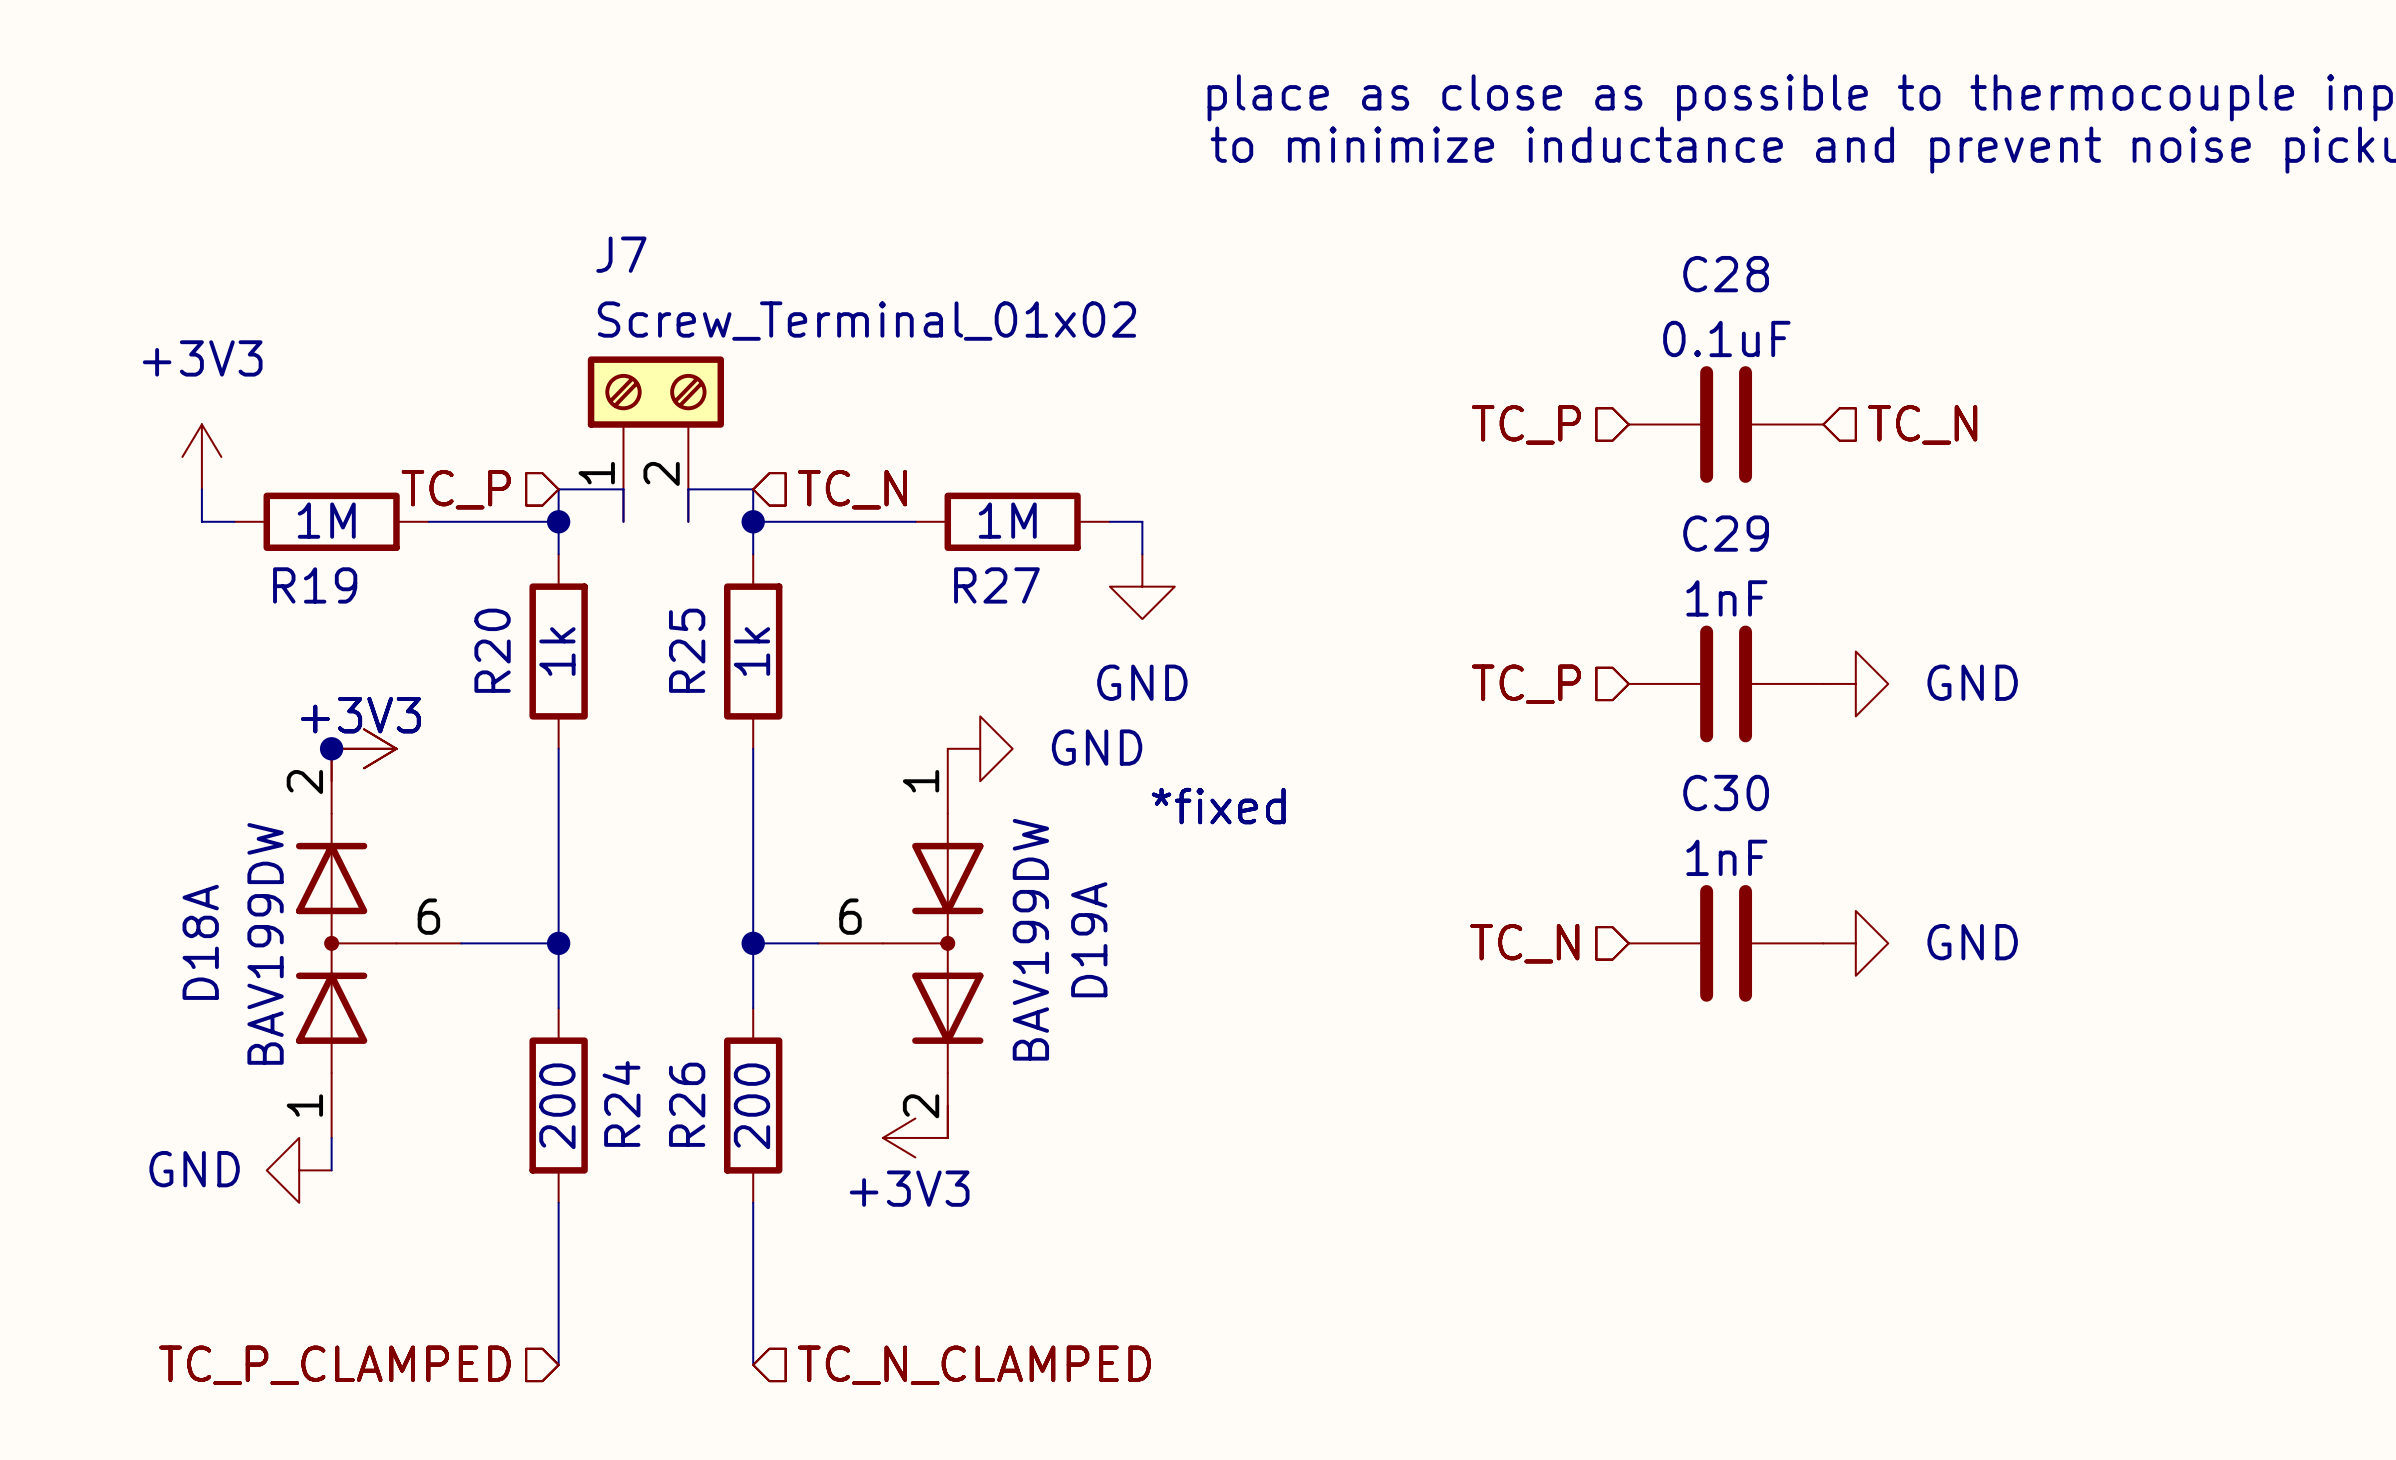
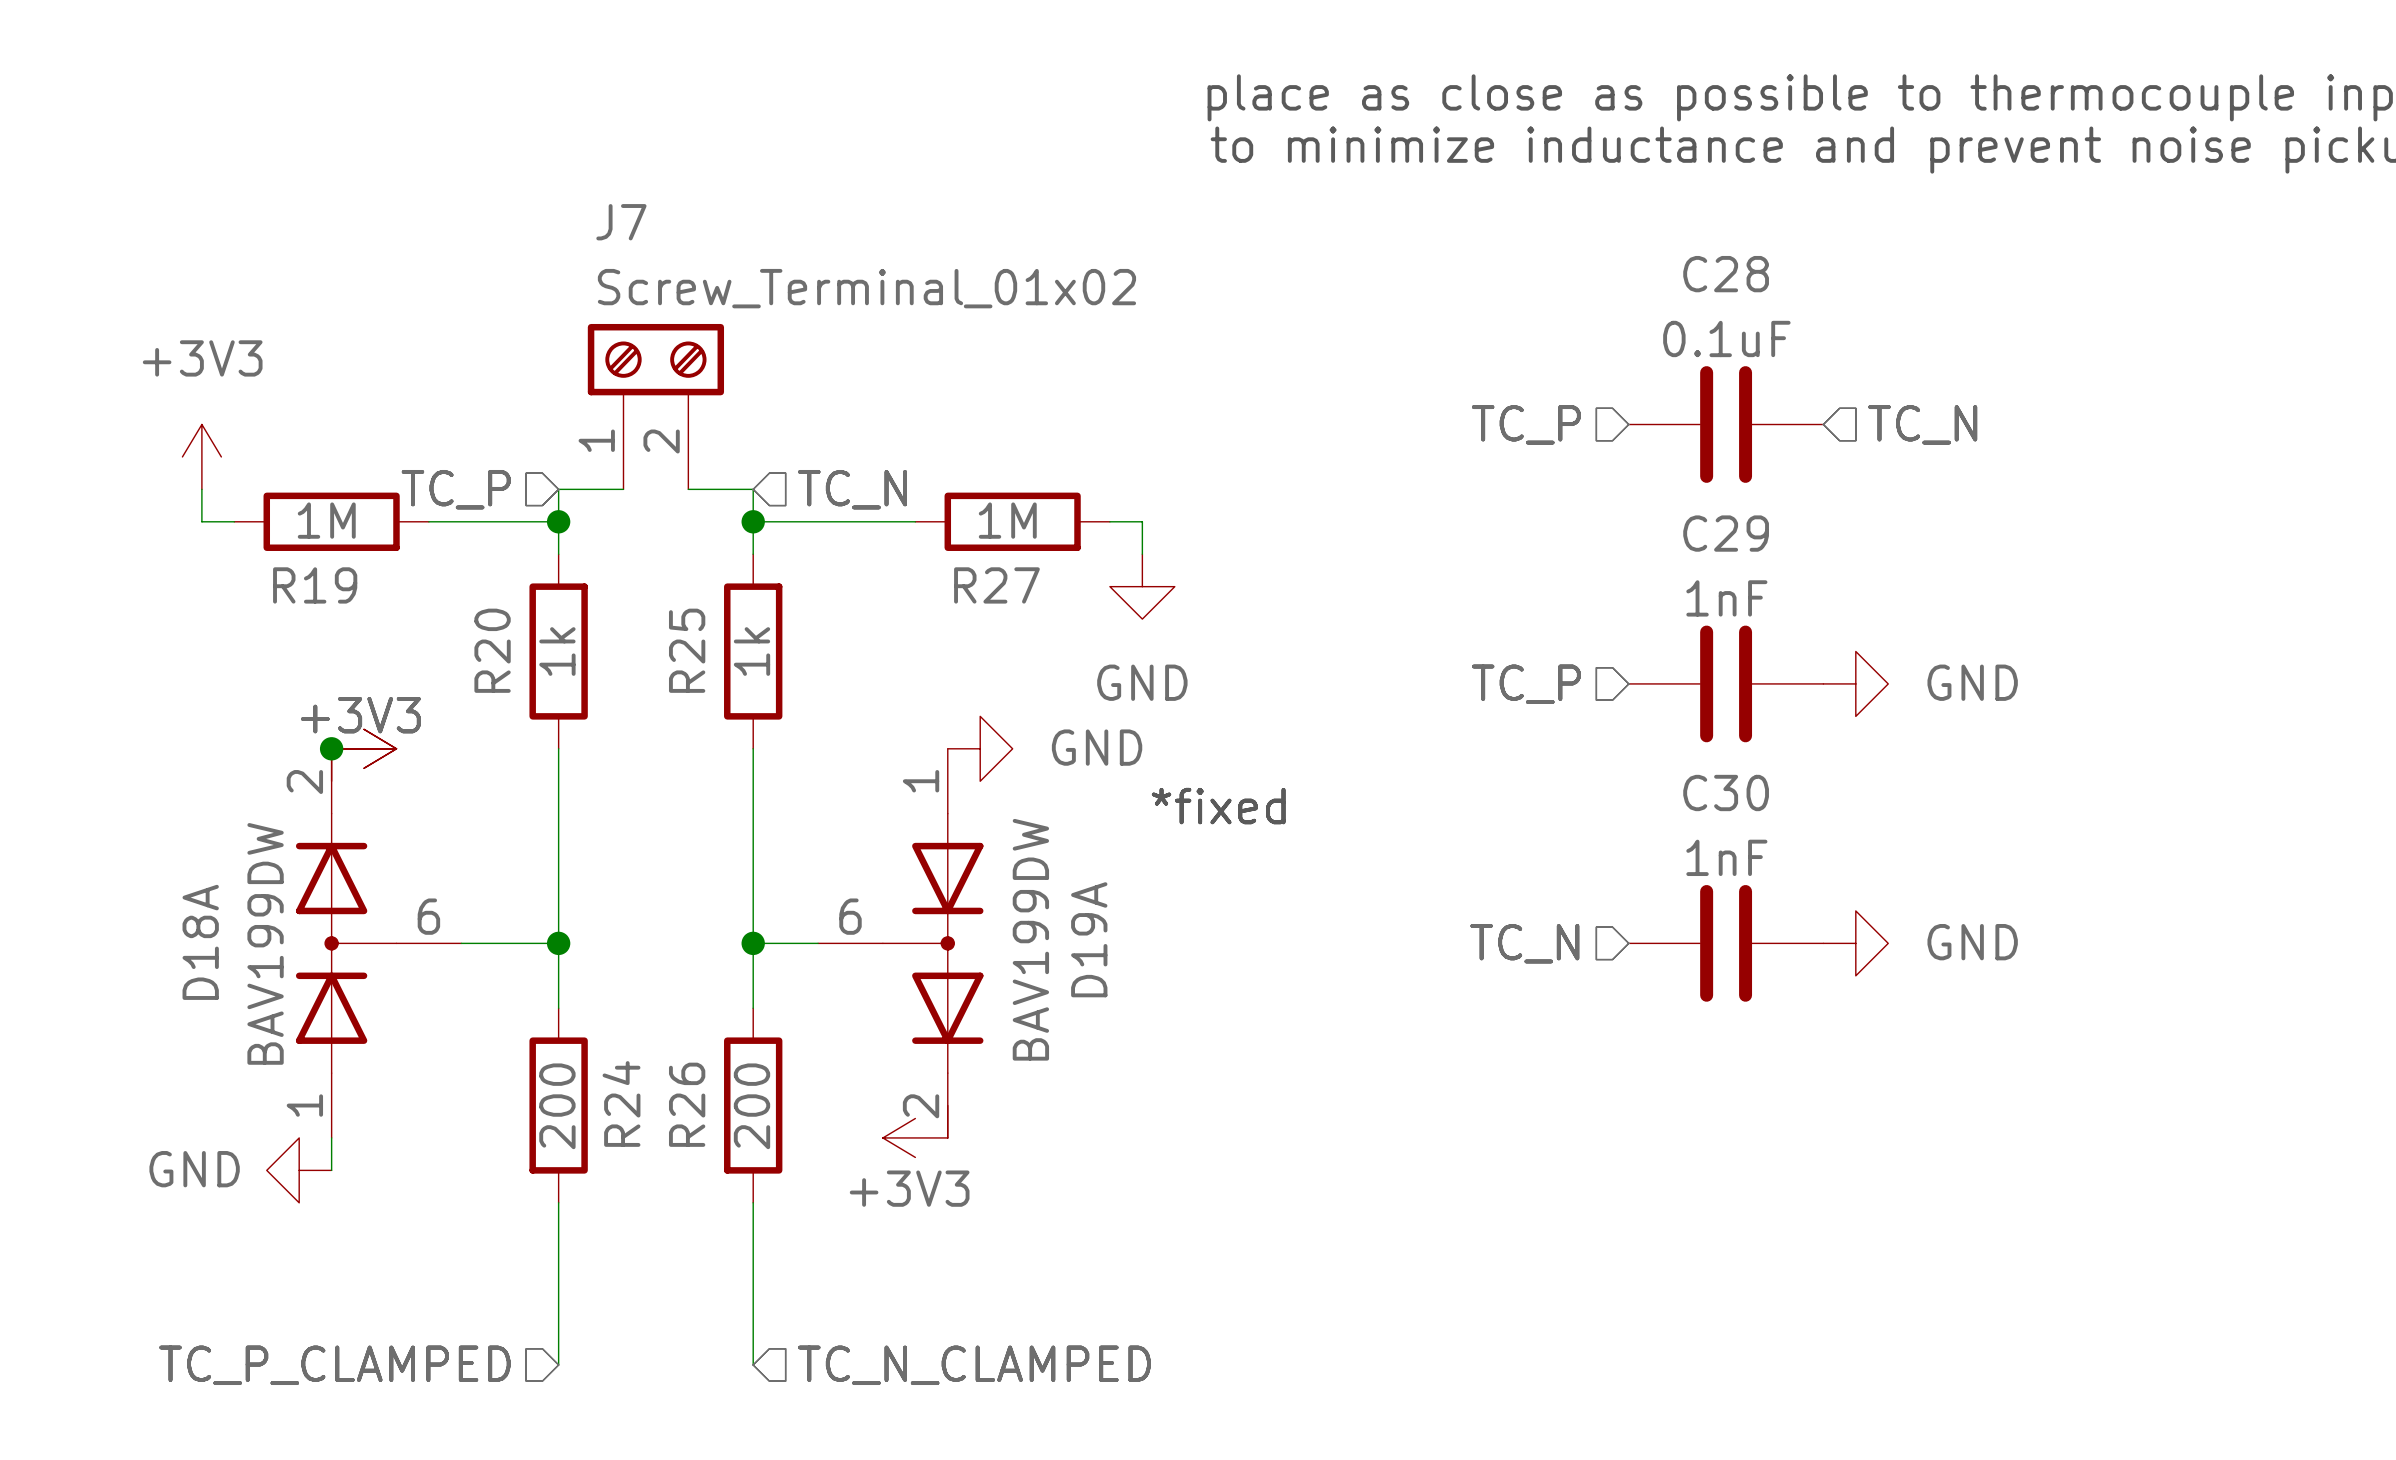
J7 position: (655, 439) -> (655, 406)
wire: (623, 489) (623, 521) -> none
wire: (688, 489) (688, 521) -> none

